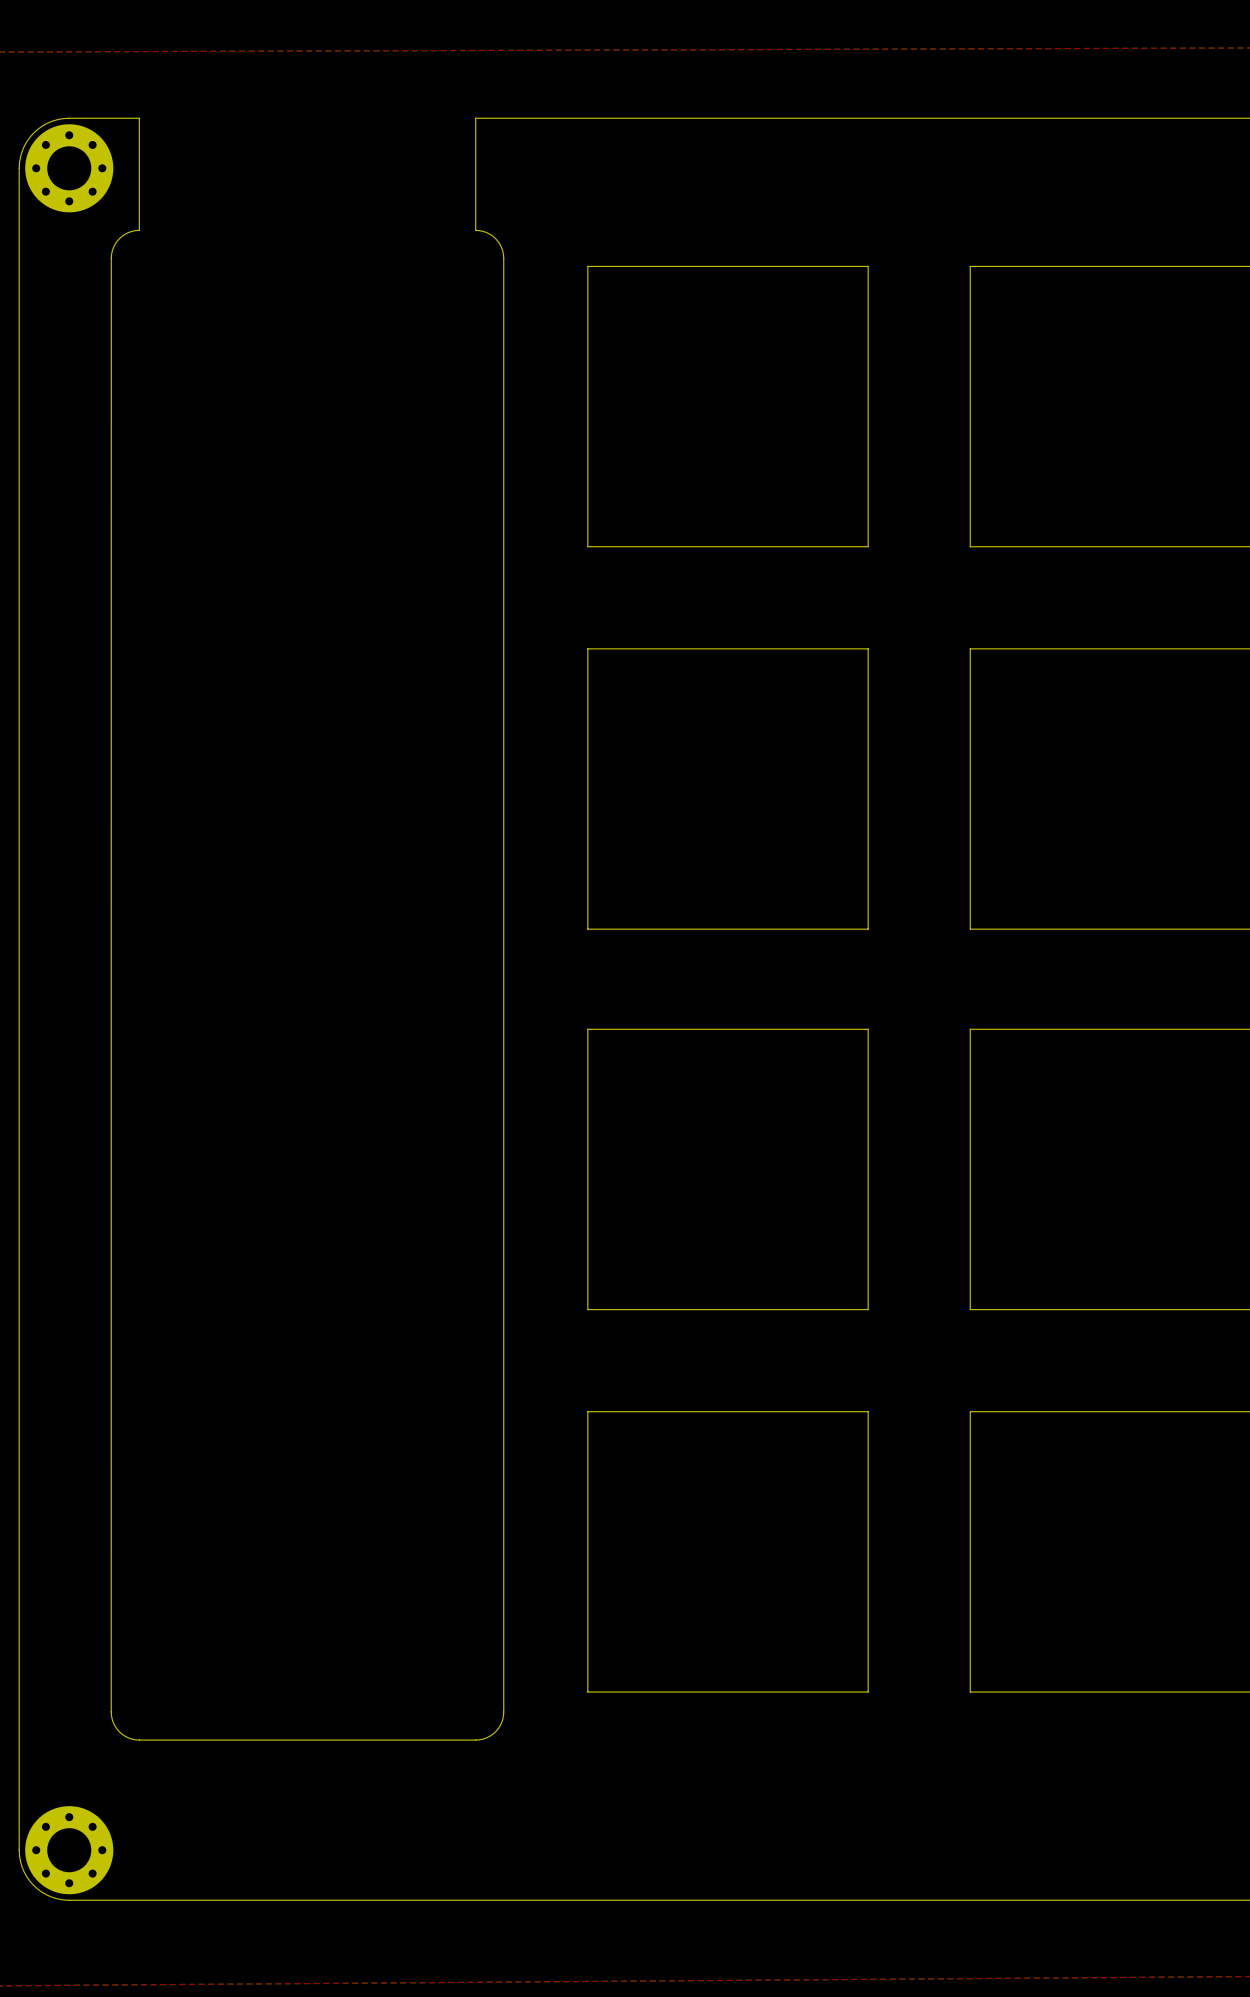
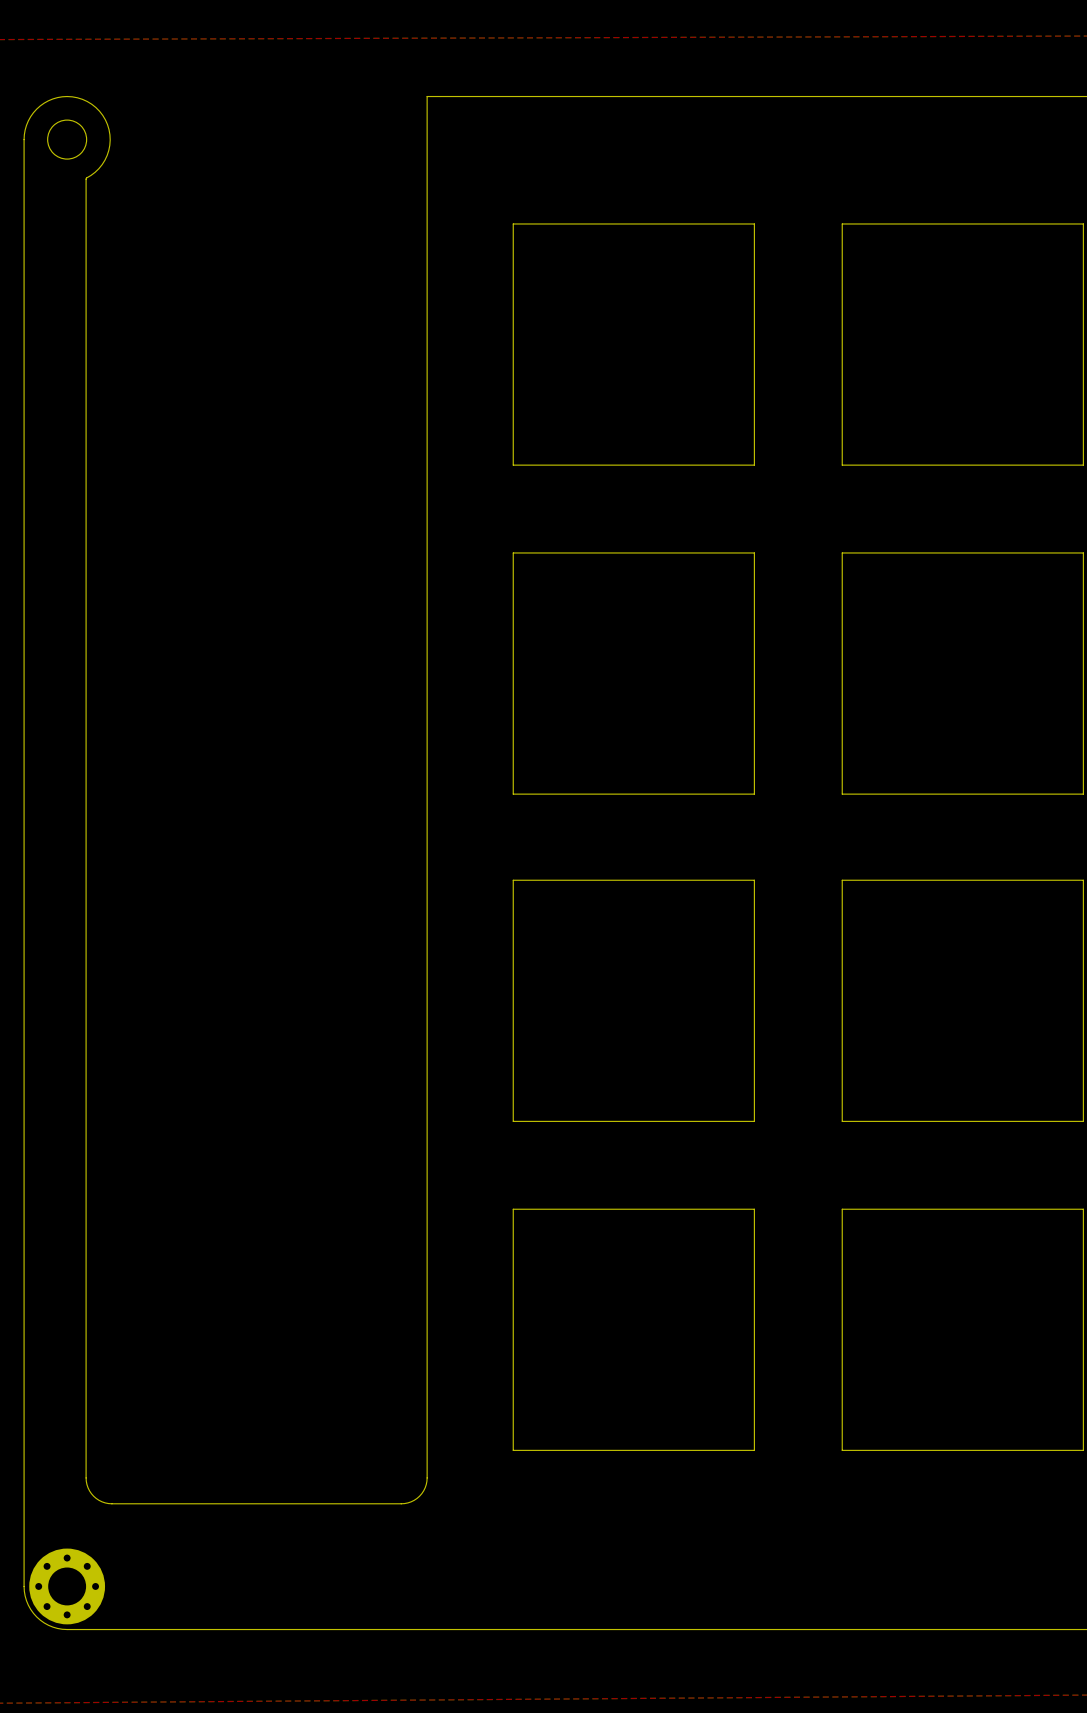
board edge: (69, 118) (139, 118) (139, 230) (128, 232) (119, 238) (113, 247) (111, 258) (111, 1712) (113, 1722) (119, 1731) (128, 1737) (139, 1740) (475, 1740) (492, 1734) (502, 1719) (503, 258) (501, 247) (495, 238) (486, 232) (475, 230) (475, 118) (487, 118) -> (67, 96) (82, 99) (99, 111) (107, 124) (110, 140) (104, 160) (98, 168) (86, 179) (86, 1477) (88, 1487) (93, 1496) (102, 1501) (111, 1503) (401, 1503) (417, 1498) (426, 1484) (427, 96)
round board edge: none -> [47, 119, 88, 160]
part: (69, 168) -> none

